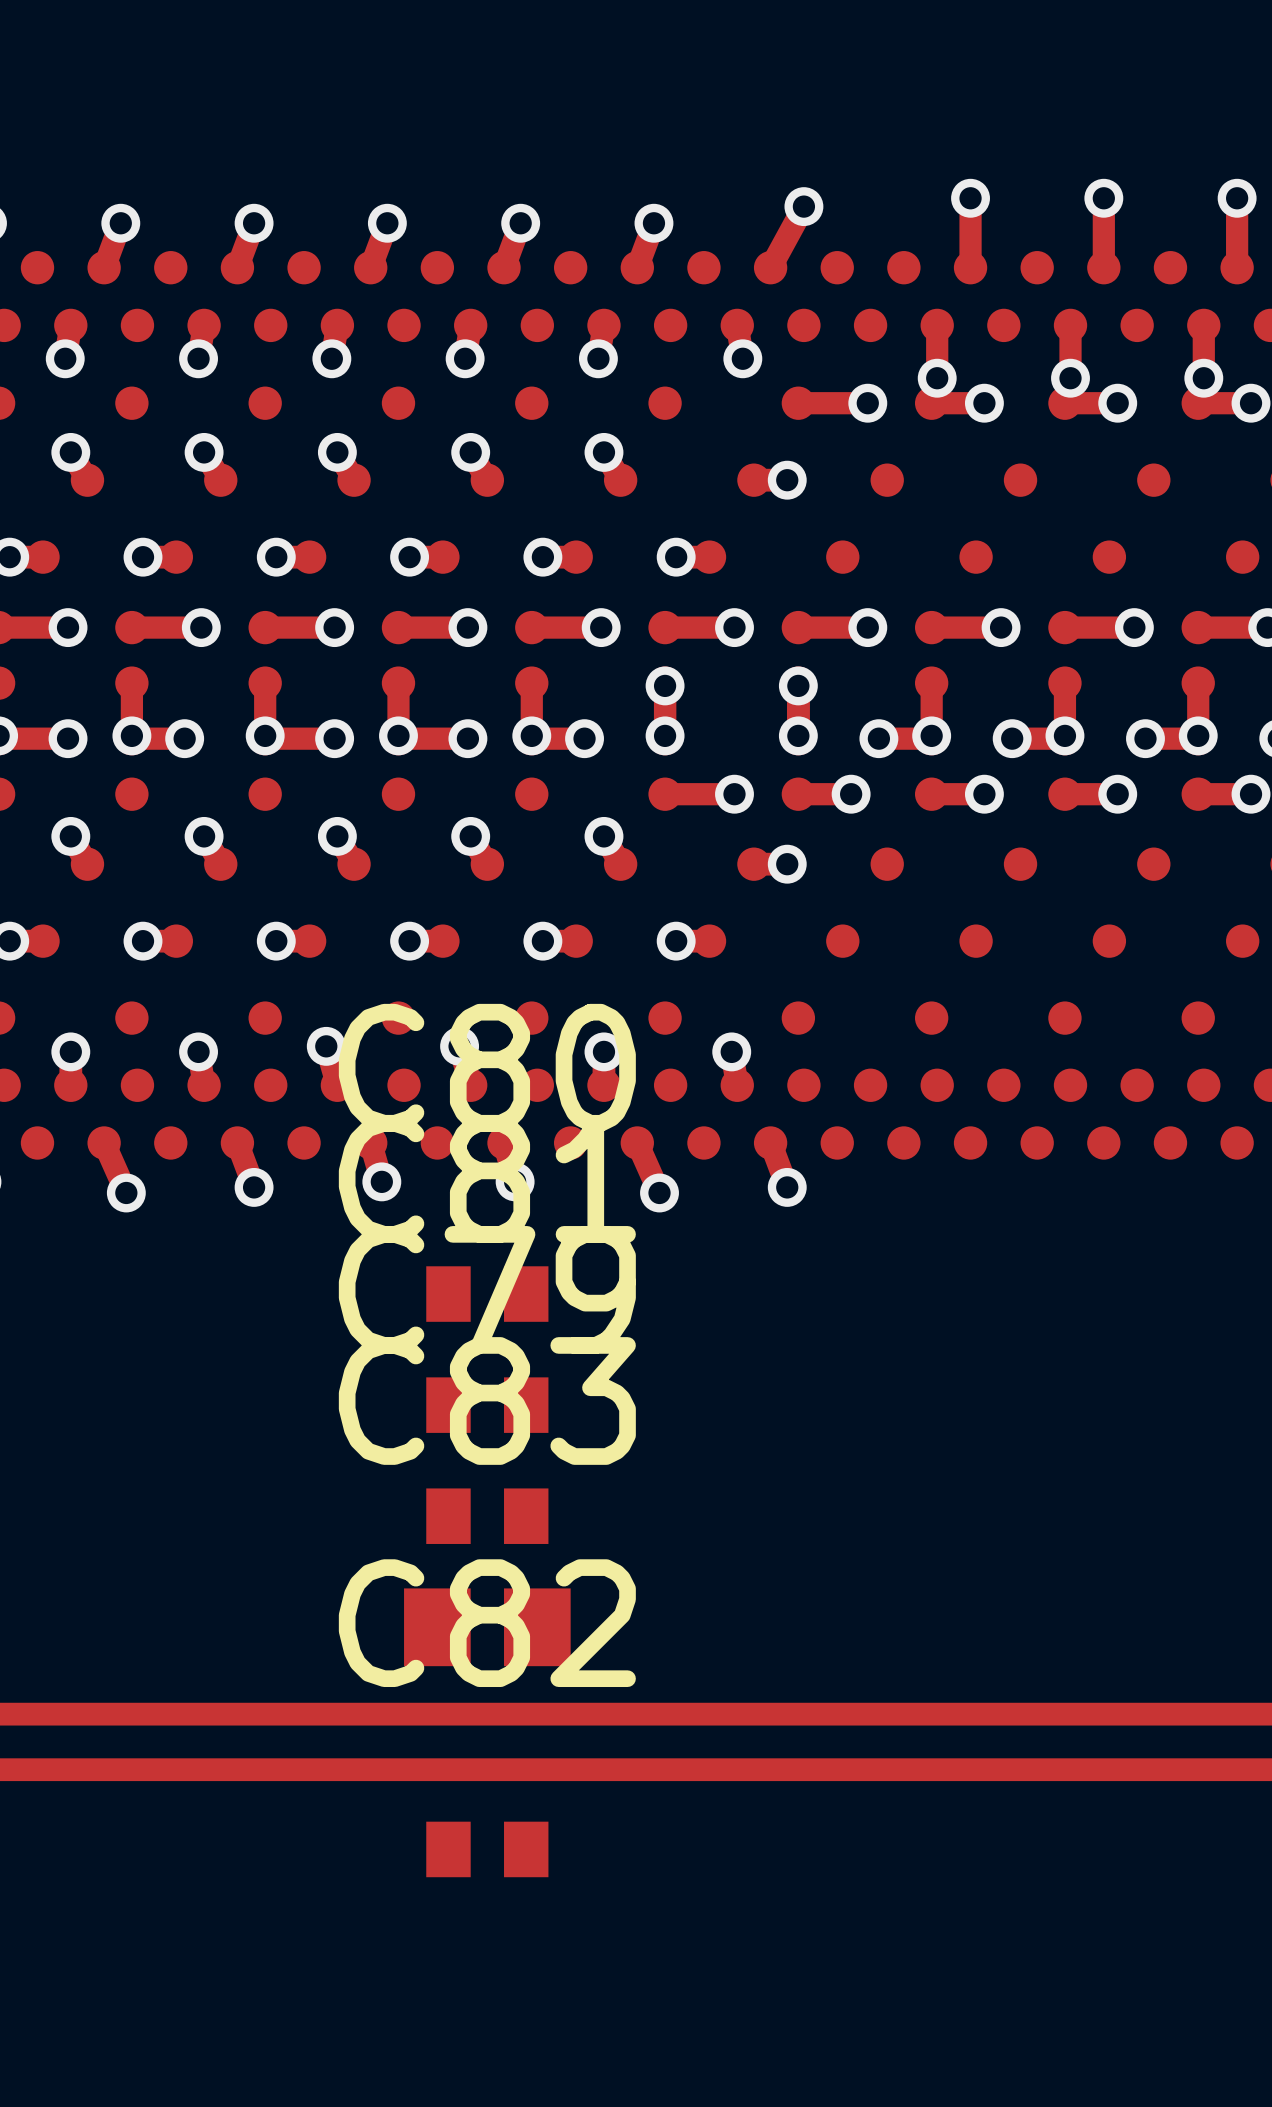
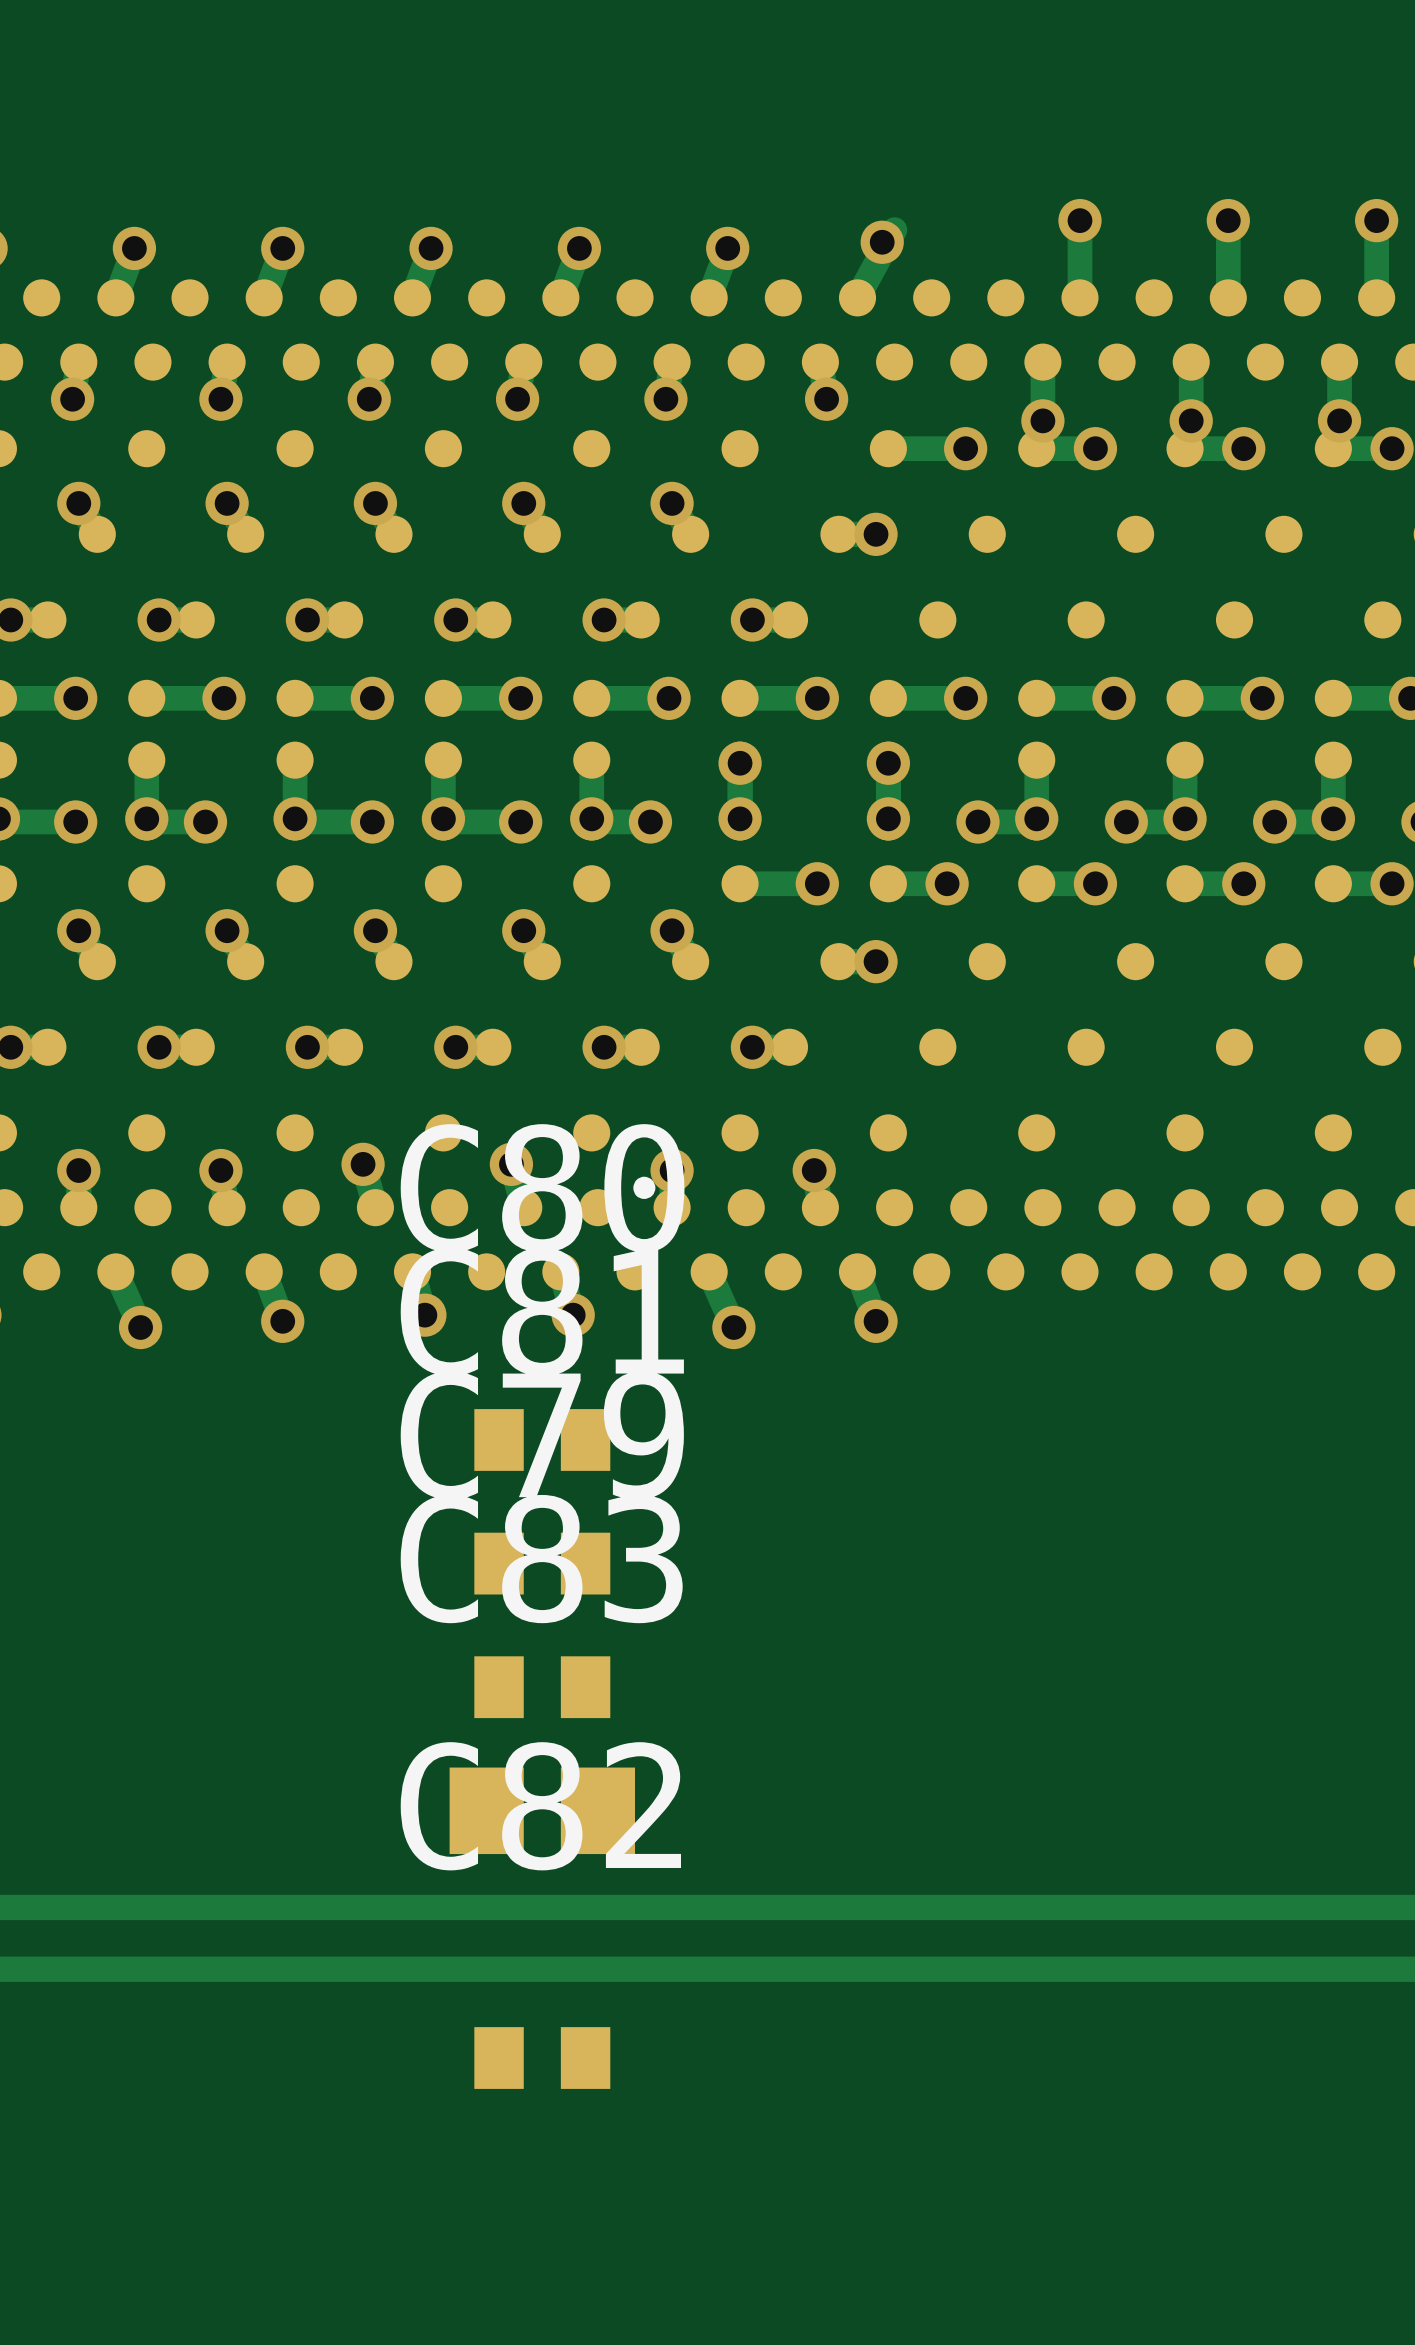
via position: (803, 206) -> (882, 242)

